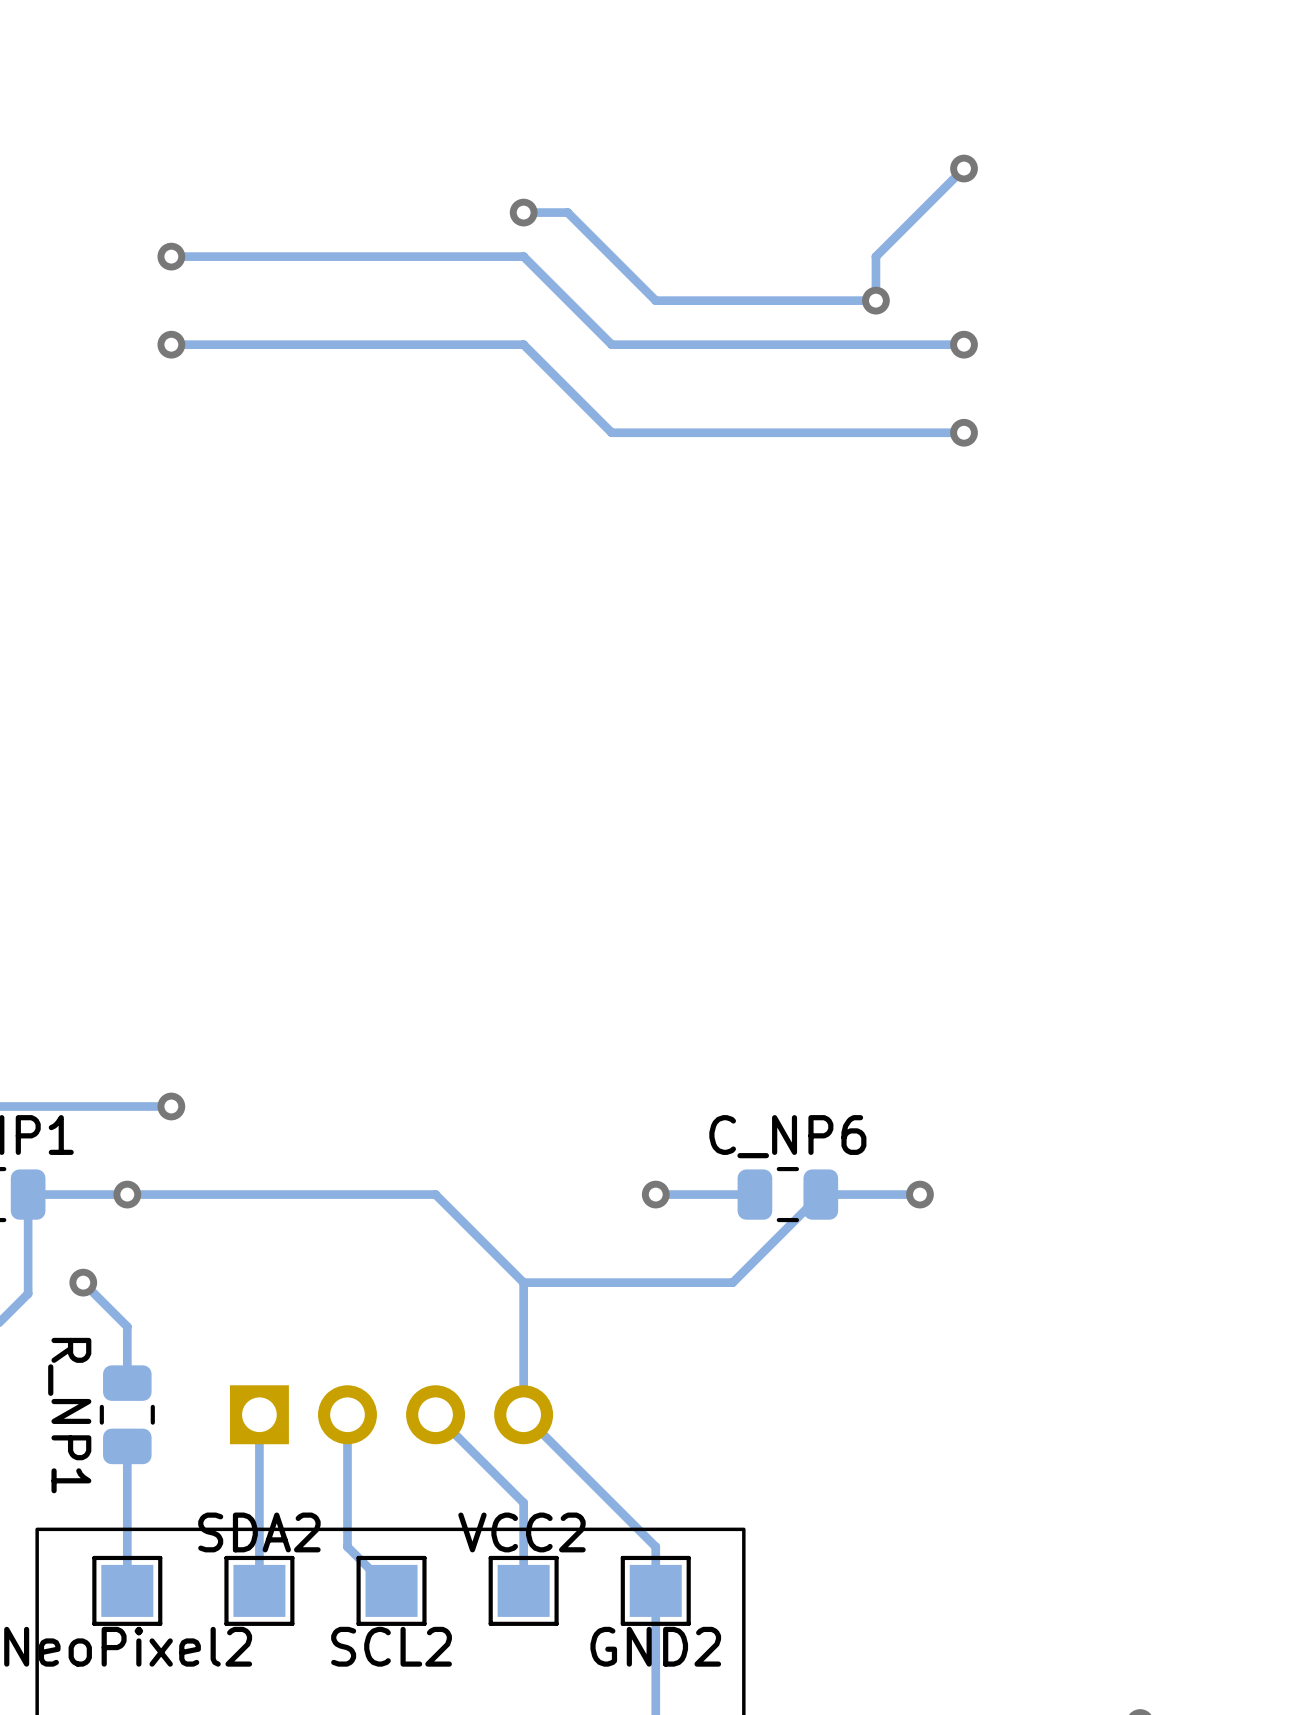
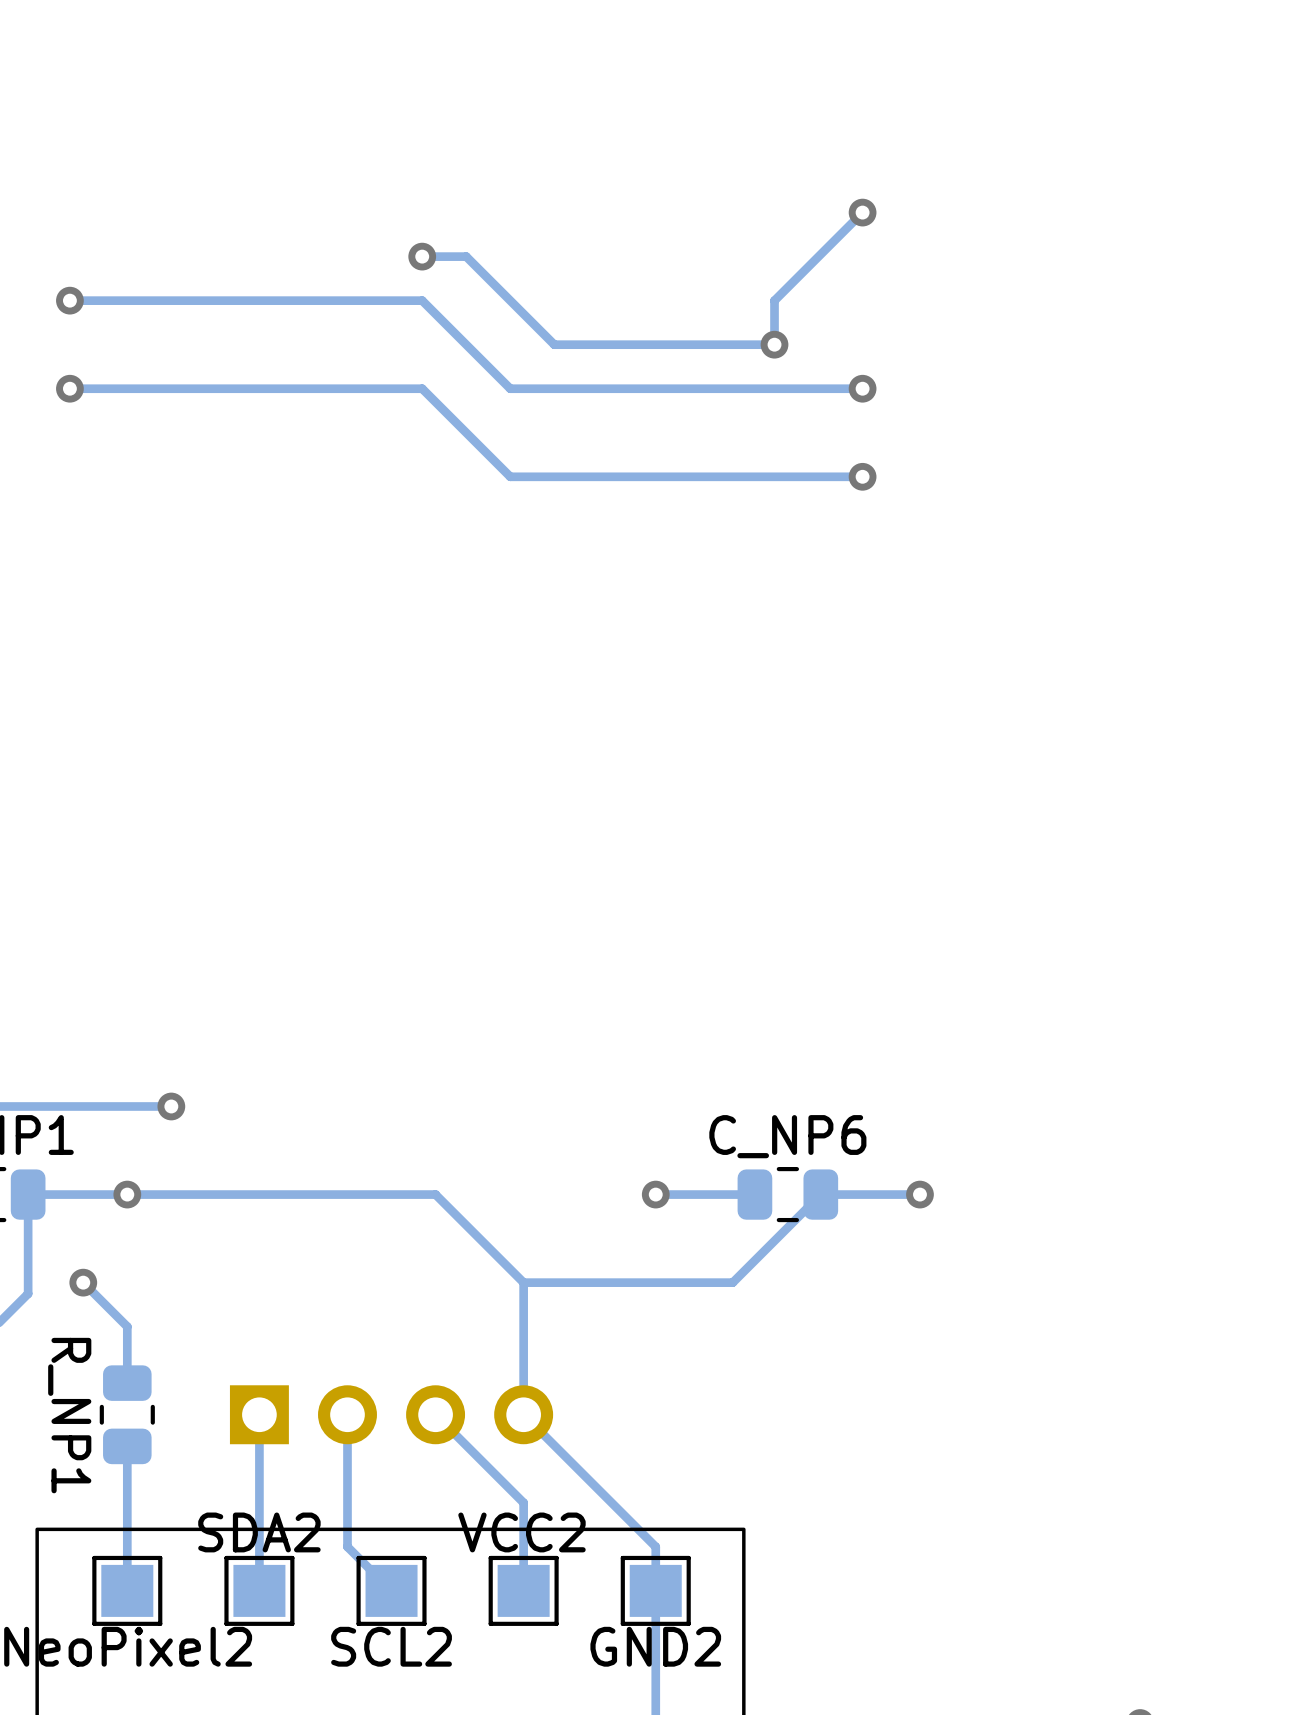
track: (964, 168) (875, 256) (875, 300) (655, 300) (567, 212) (523, 212) -> none
via: (964, 168) -> none
via position: (523, 212) -> (422, 256)
via: none -> (862, 212)
via: (171, 256) -> none
track: (422, 256) (171, 256) -> none
track: (466, 256) (523, 256) (611, 344) -> (466, 256) (554, 344) (611, 344)
track: none -> (69, 300) (422, 300) (510, 388) (862, 388)
via: none -> (69, 300)
via: (875, 300) -> none
track: (171, 344) (523, 344) (611, 432) (964, 432) -> (69, 388) (422, 388) (510, 476) (862, 476)
via: (171, 344) -> none
via: none -> (774, 344)
track: (964, 344) (774, 344) -> (862, 212) (774, 300) (774, 344)
via: (964, 344) -> none
via: none -> (69, 388)
via: none -> (862, 388)
via: (964, 432) -> none
via: none -> (862, 476)

